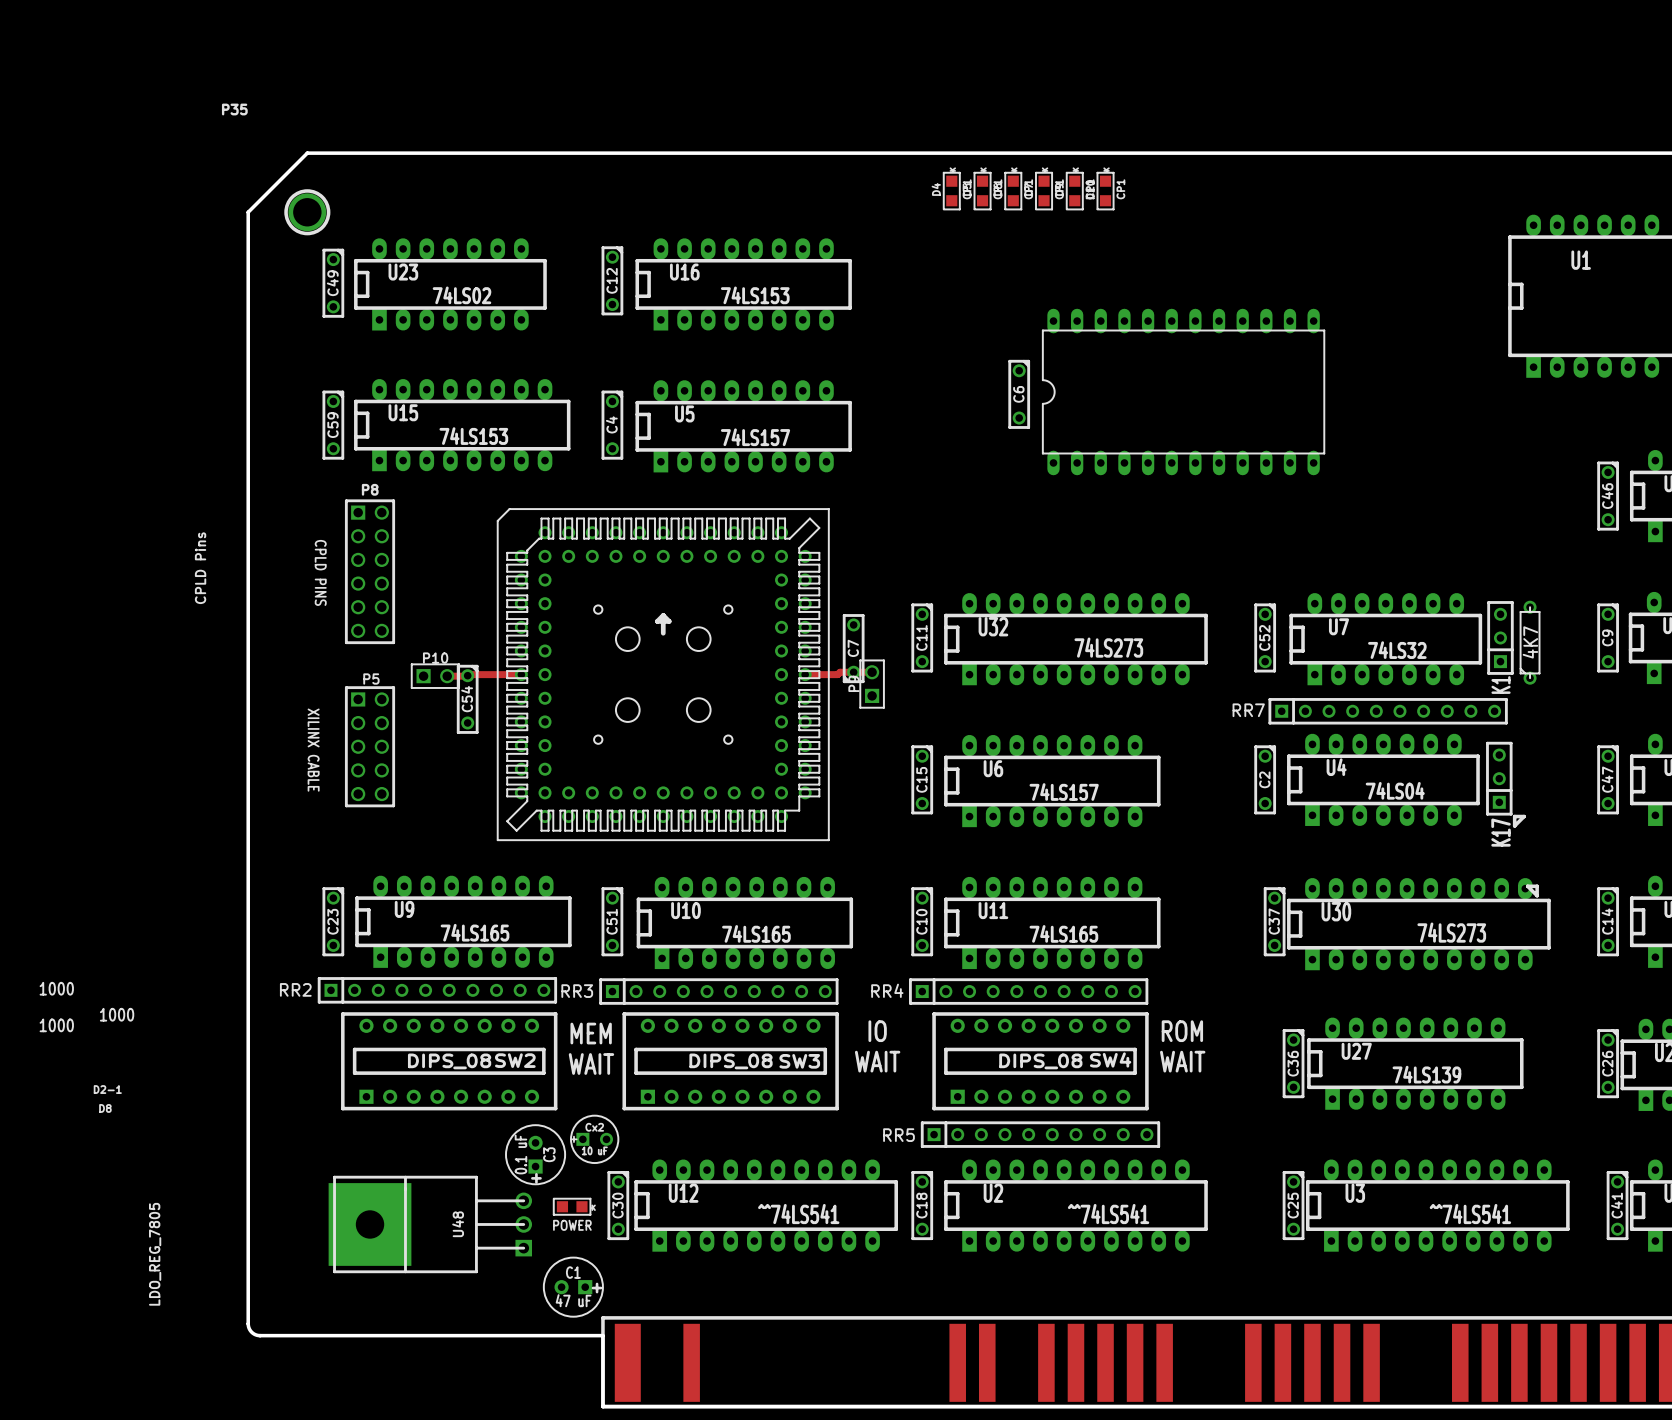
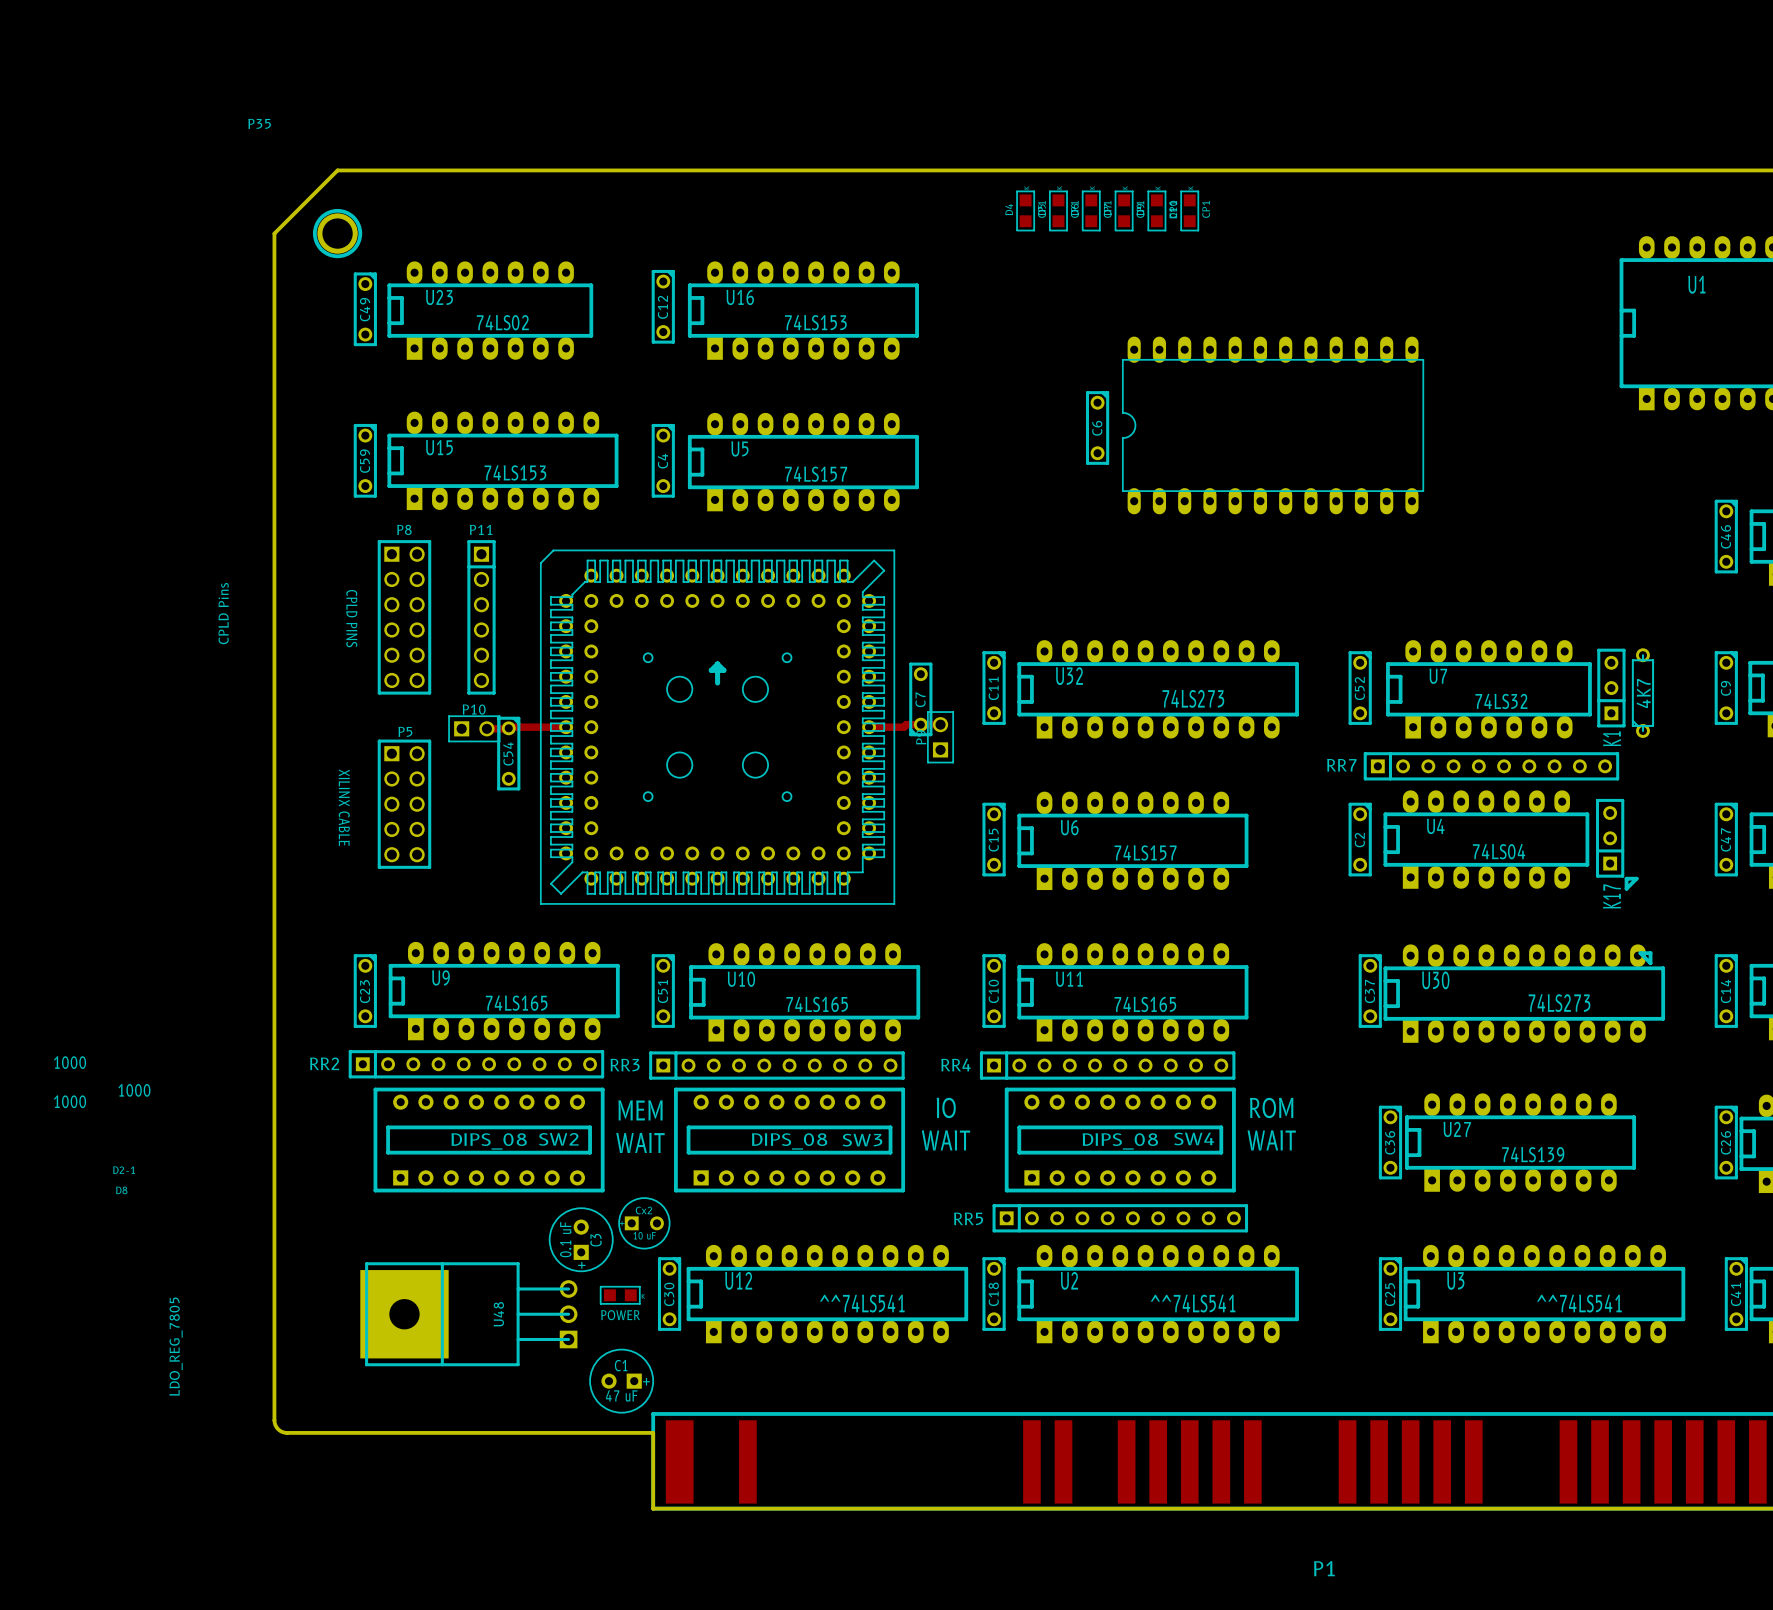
P11: none -> (481, 617)

